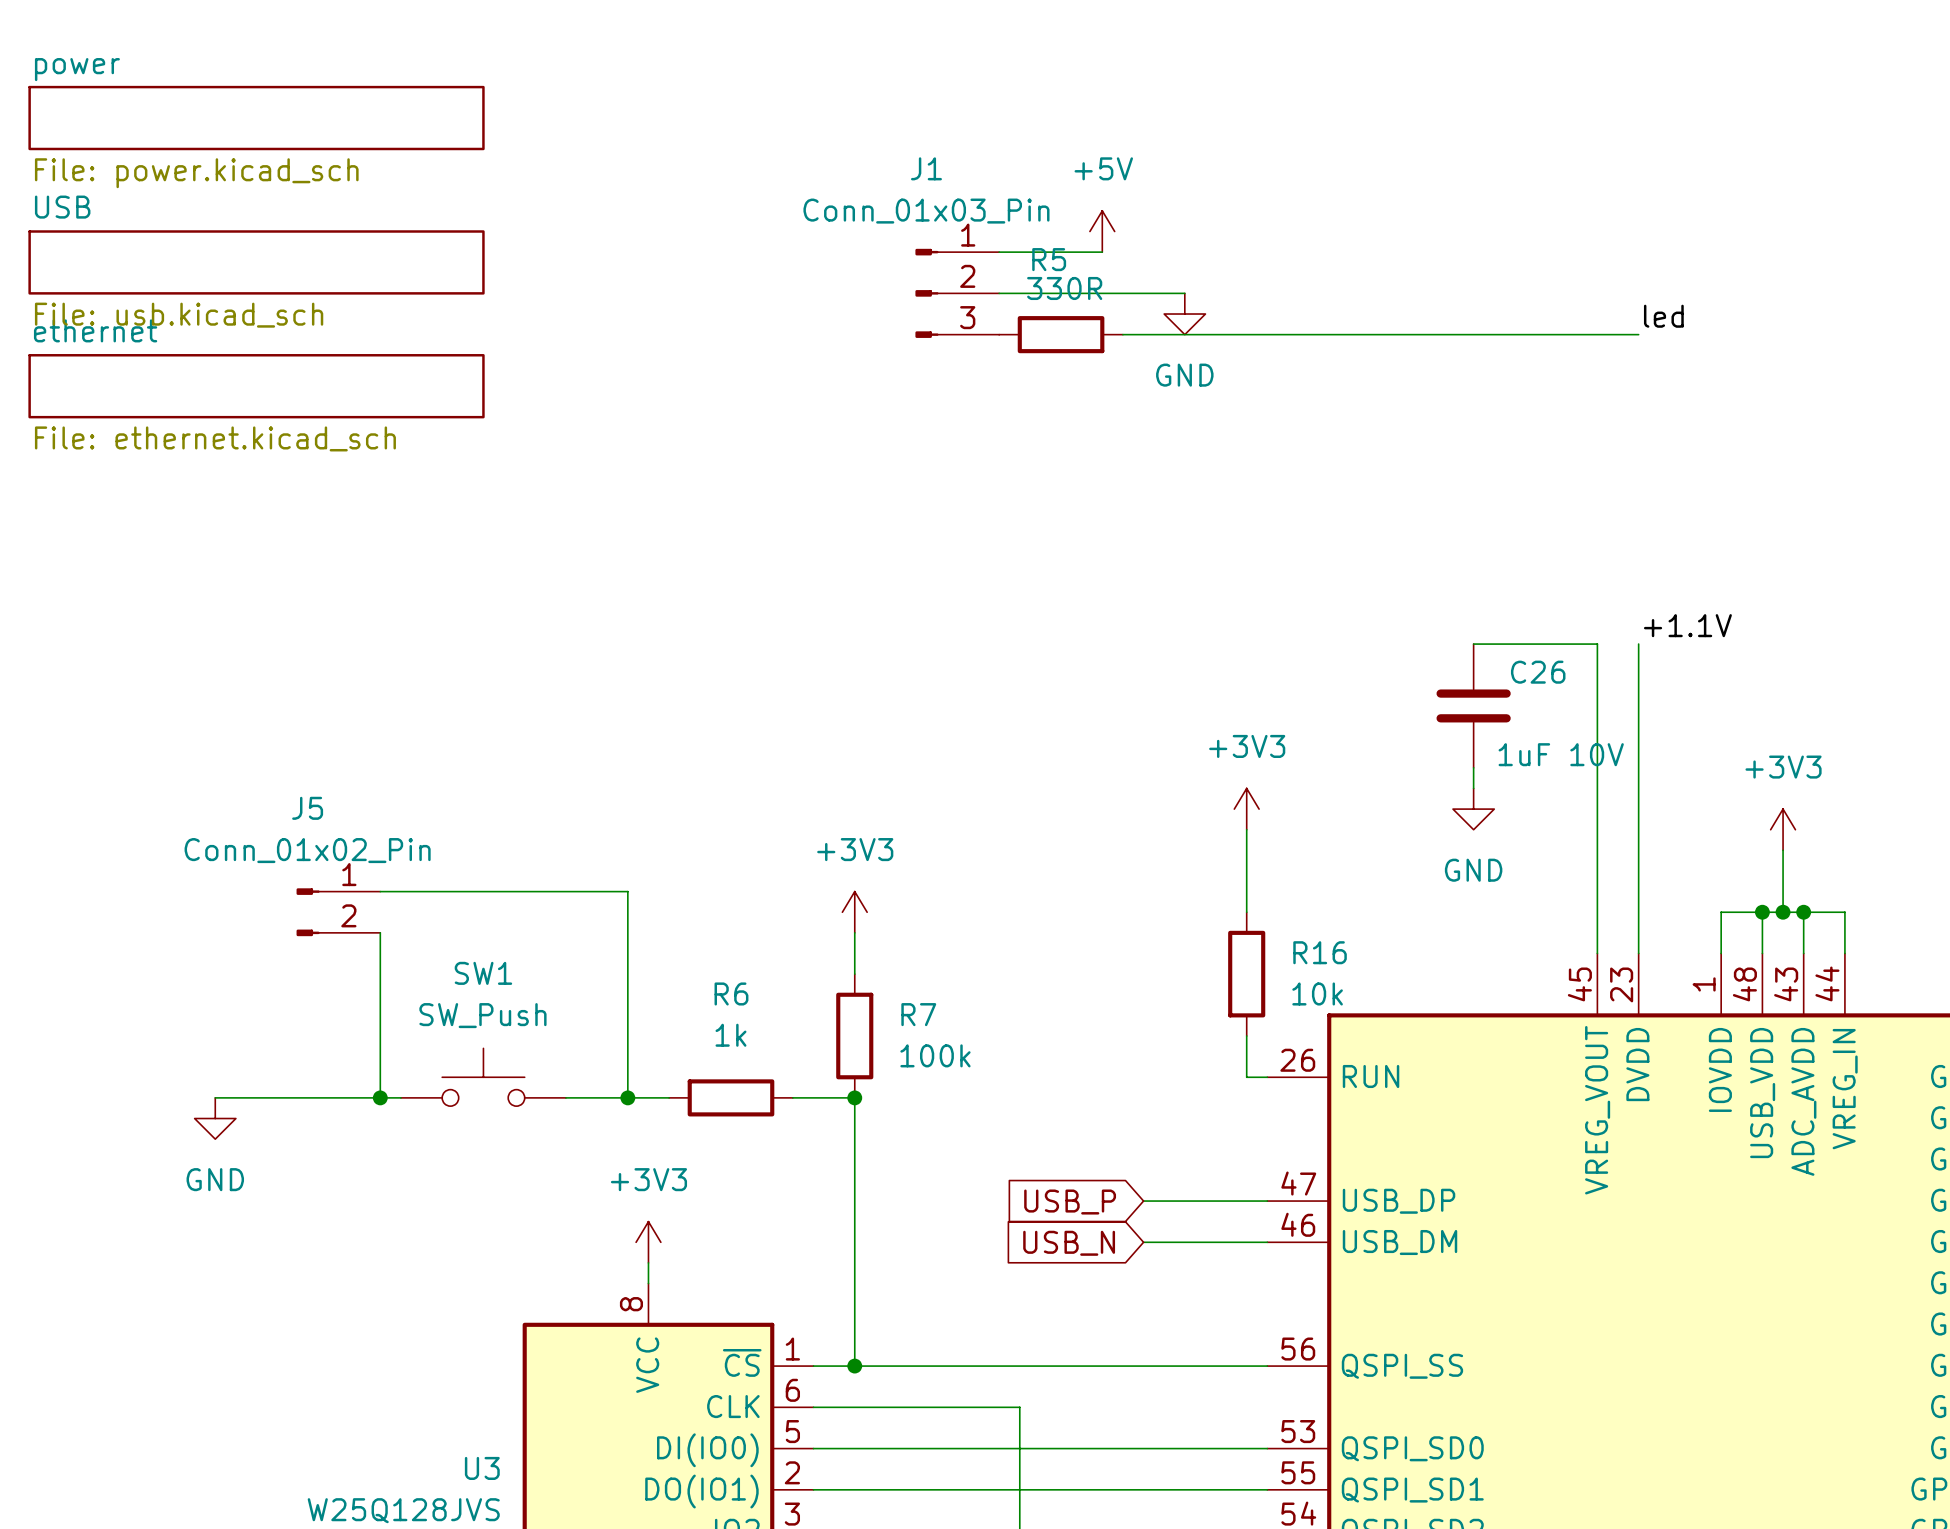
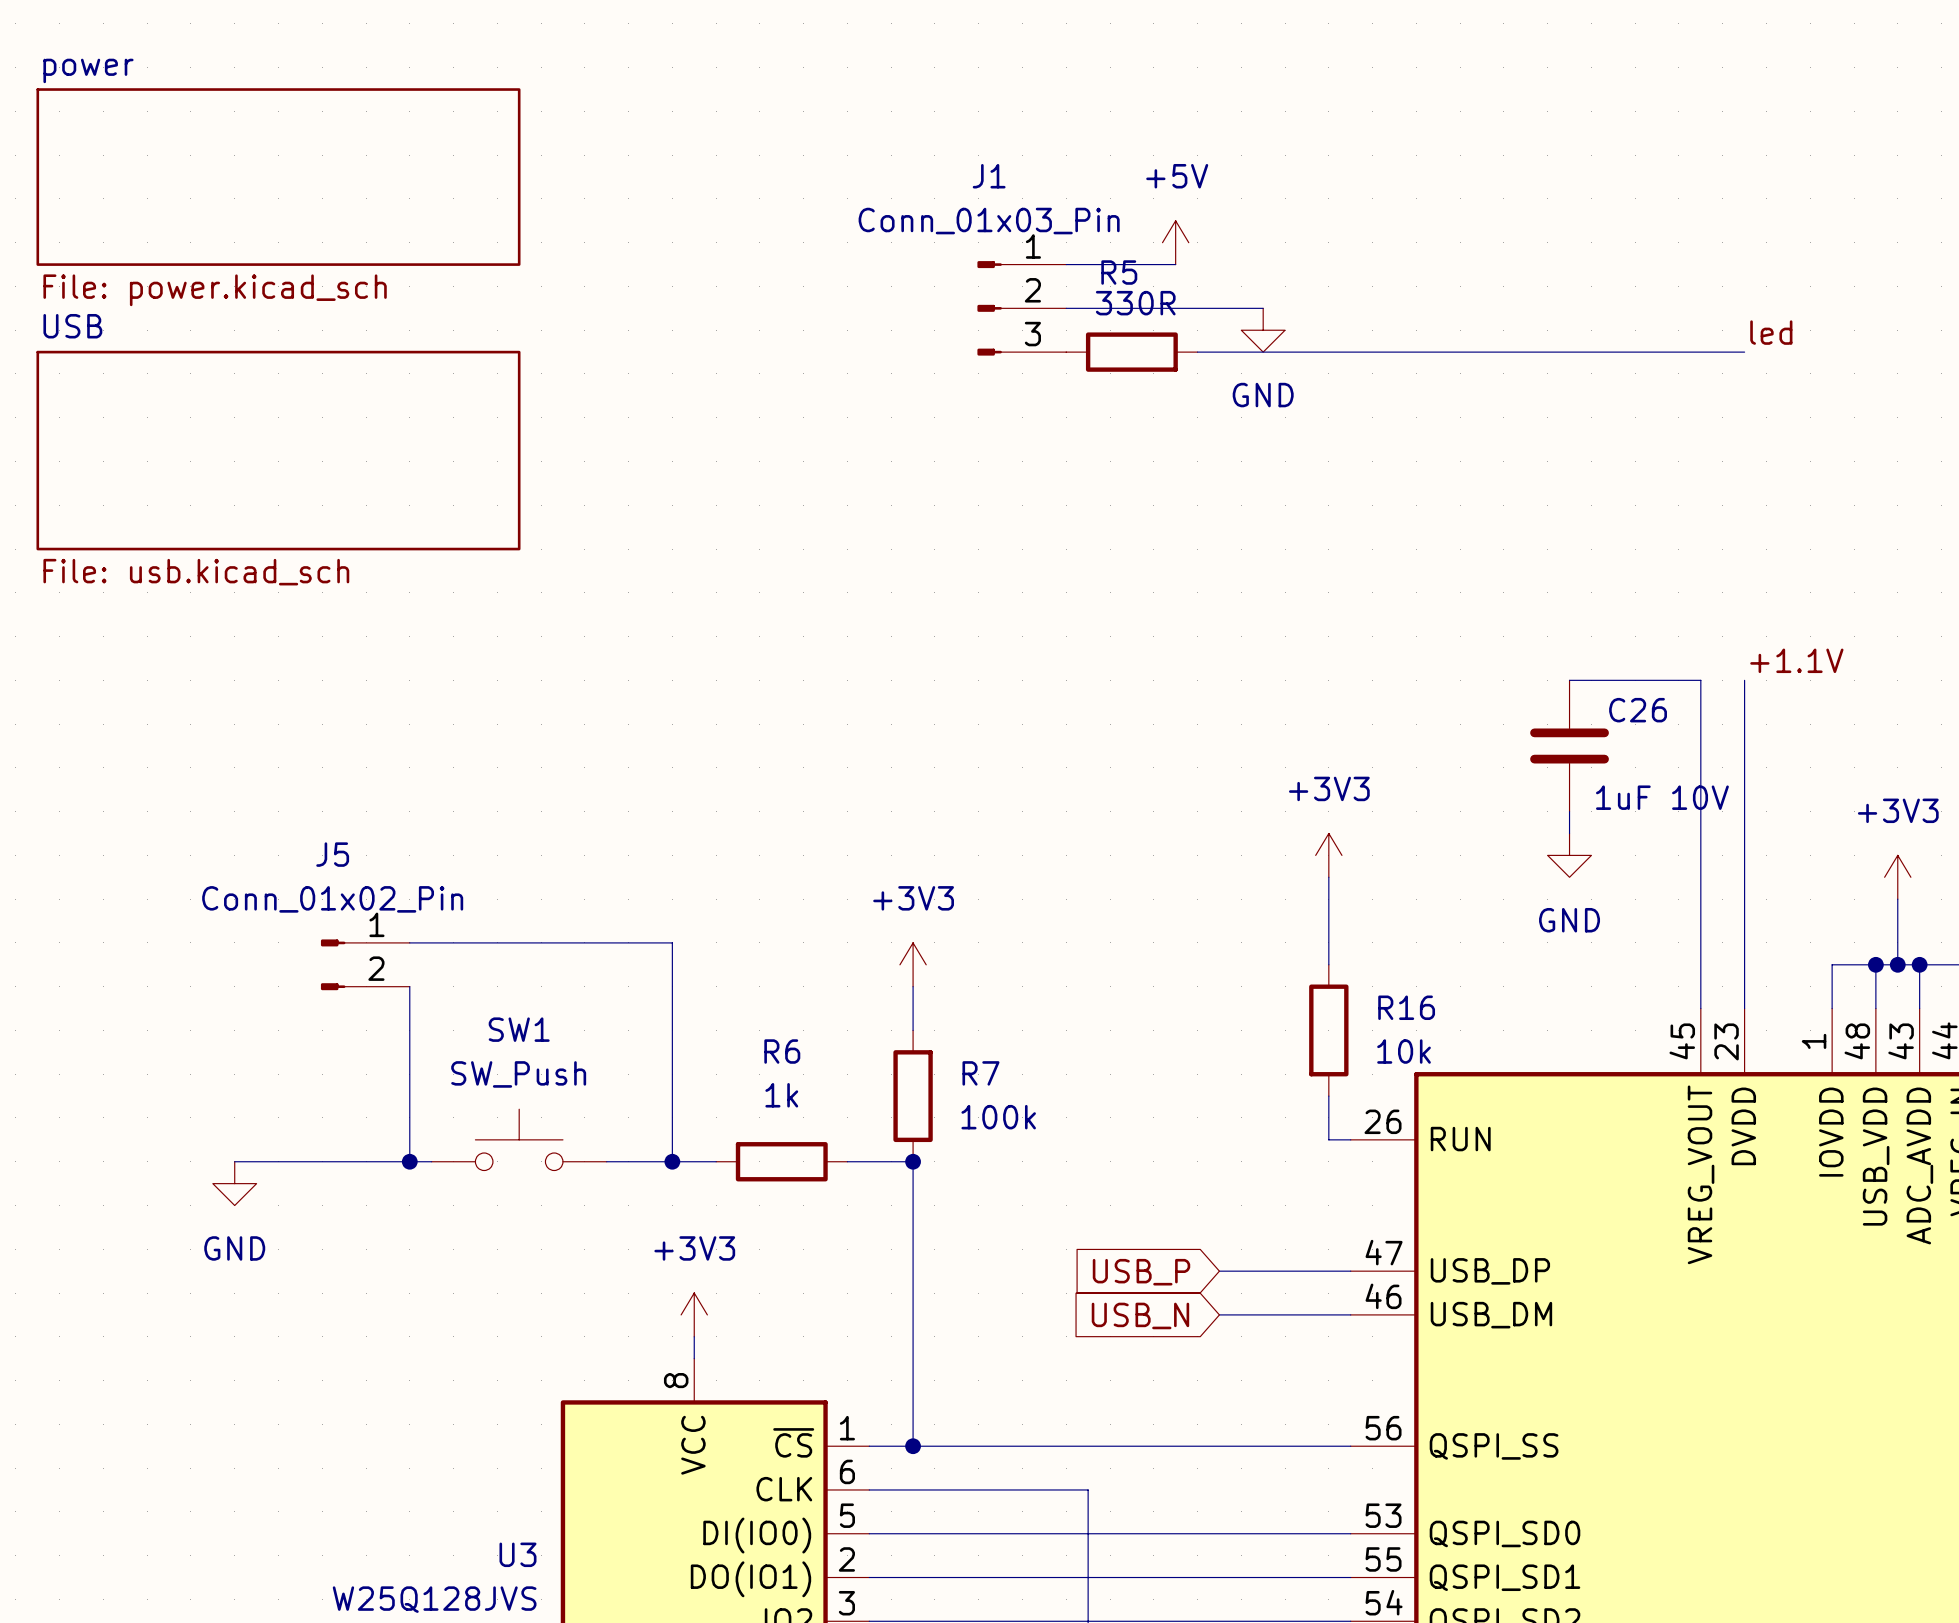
sheet power: File: power.kicad_sch (256, 118) -> none
sheet power: none -> File: power.kicad_sch (278, 177)
sheet USB: File: usb.kicad_sch (256, 262) -> none
sheet ethernet: File: ethernet.kicad_sch (256, 386) -> none
sheet USB: none -> File: usb.kicad_sch (278, 450)

